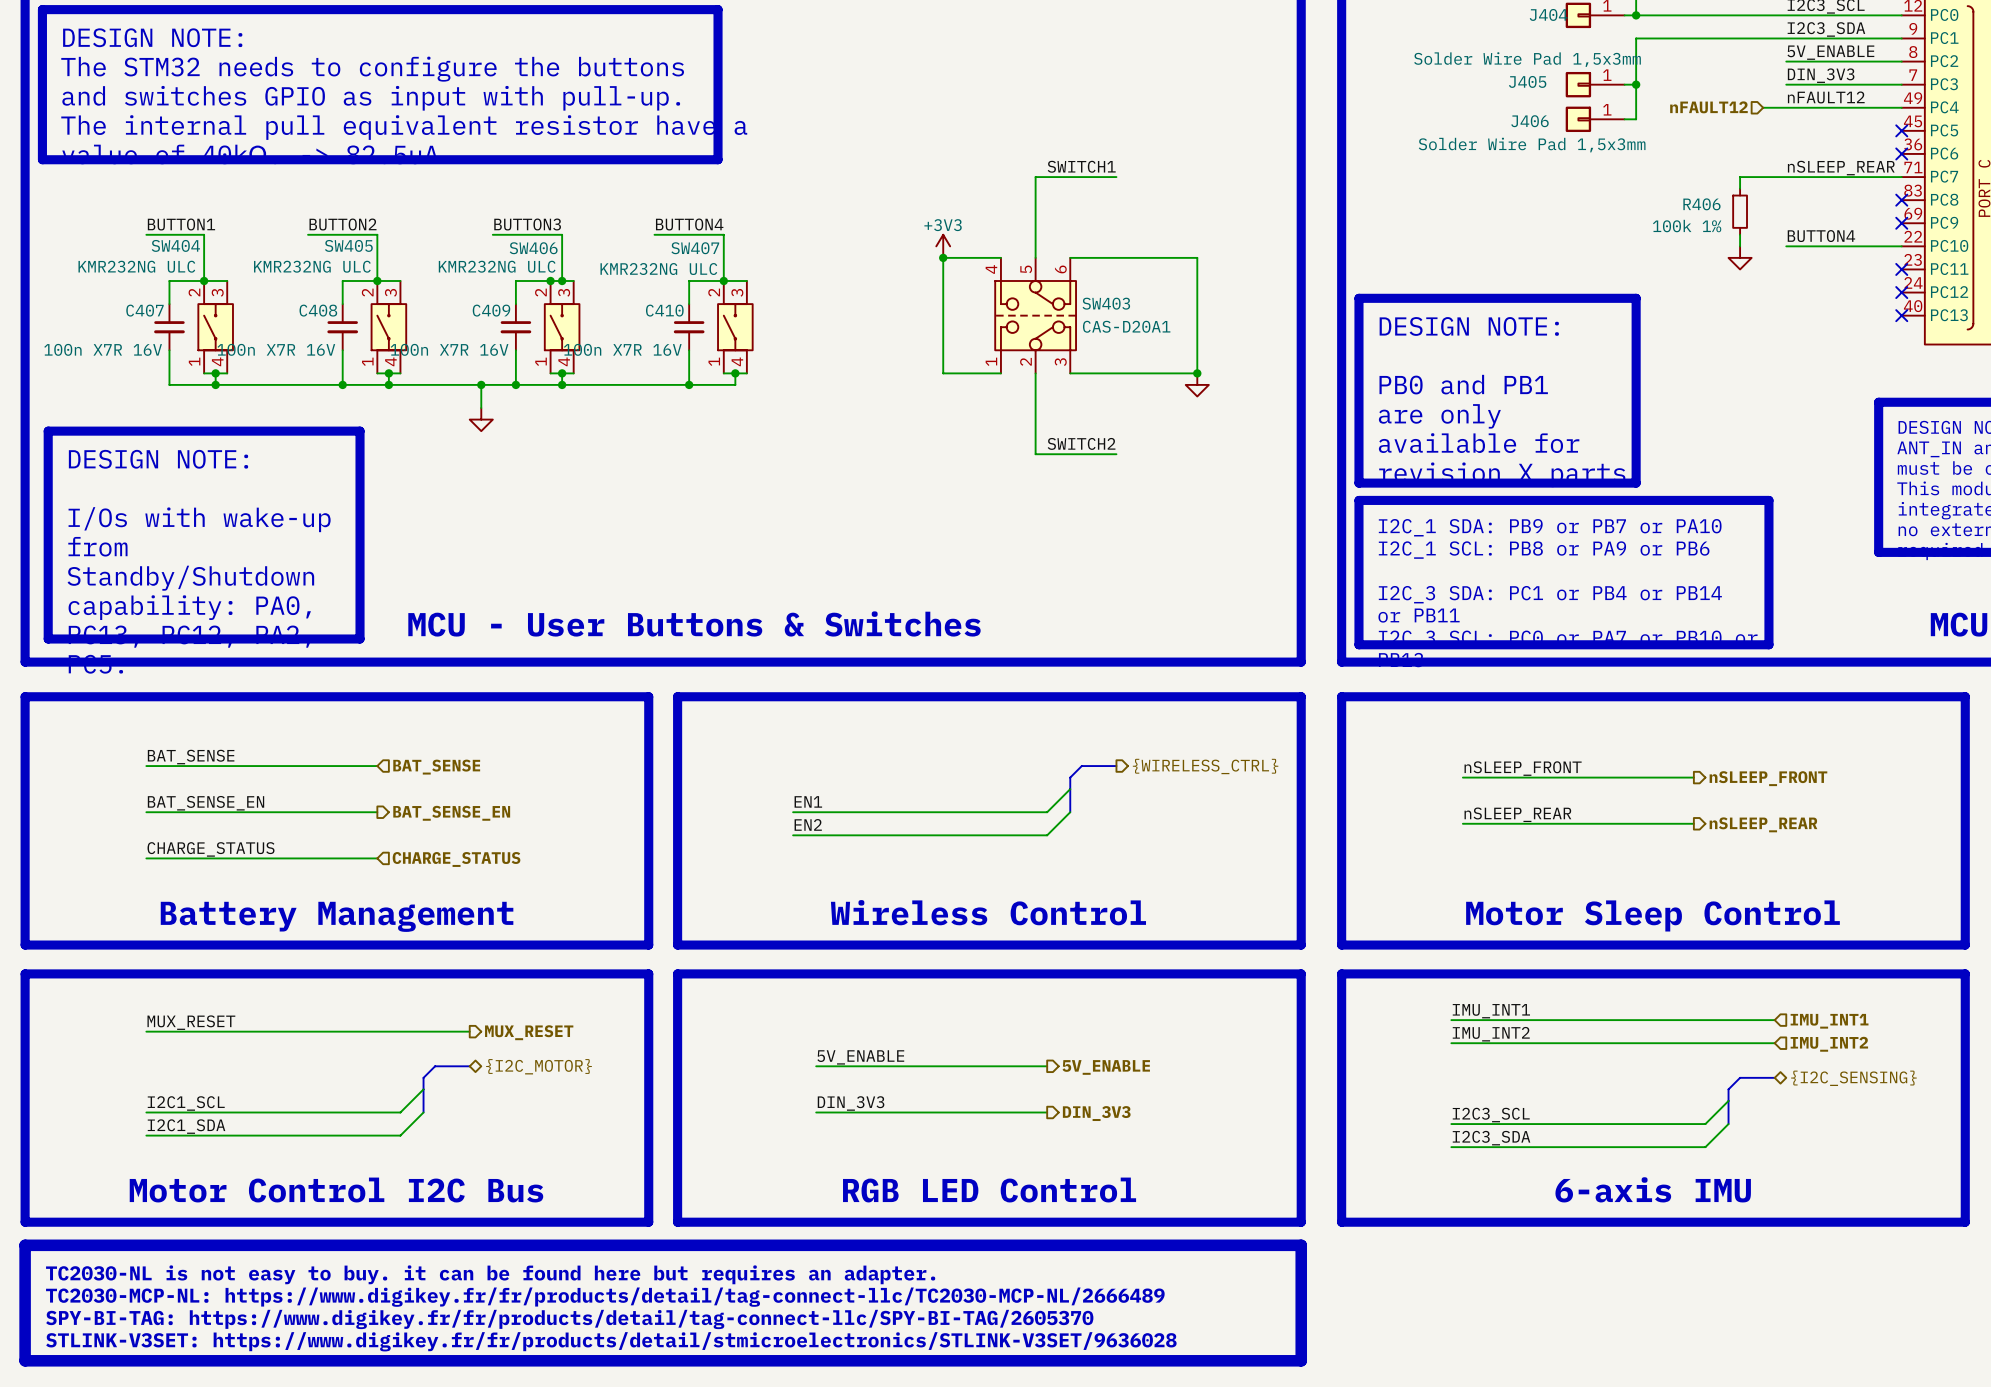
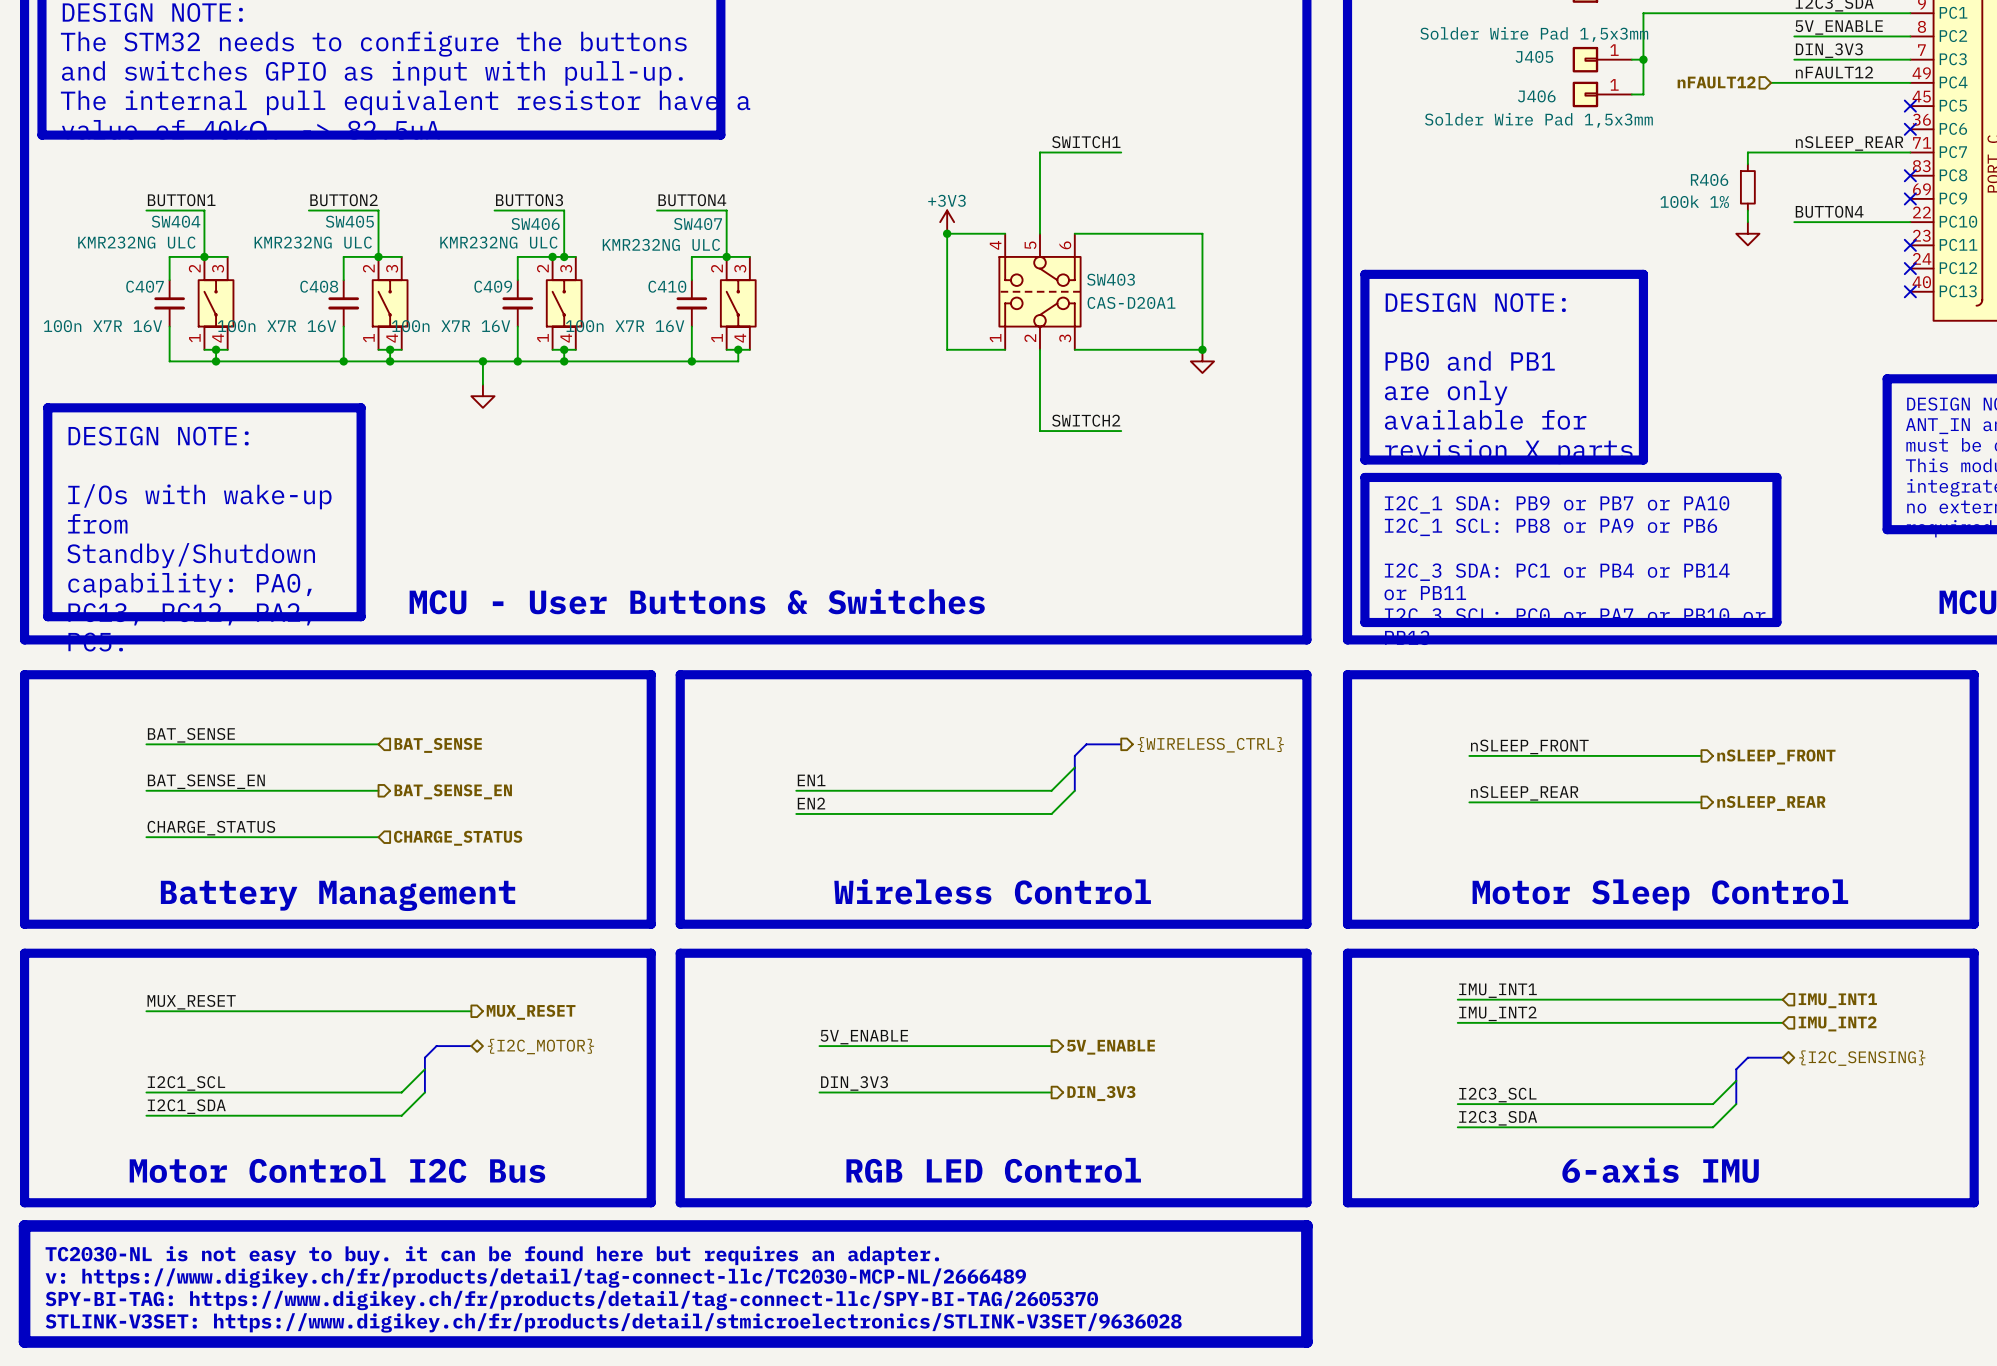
text: TC2030-MCP-NL: https://www.digikey.fr/fr/products/detail/tag-connect-llc/TC2030-MCP-NL/2666489 (605, 1297) -> v: https://www.digikey.ch/fr/products/detail/tag-connect-llc/TC2030-MCP-NL/2666489 (535, 1278)
text: SPY-BI-TAG: https://www.digikey.fr/fr/products/detail/tag-connect-llc/SPY-BI-TAG/2605370 (569, 1319) -> SPY-BI-TAG: https://www.digikey.ch/fr/products/detail/tag-connect-llc/SPY-BI-TAG/2605370 (571, 1300)
text: STLINK-V3SET: https://www.digikey.fr/fr/products/detail/stmicroelectronics/STLINK-V3SET/9636028 (611, 1341) -> STLINK-V3SET: https://www.digikey.ch/fr/products/detail/stmicroelectronics/STLINK-V3SET/9636028 (613, 1322)

